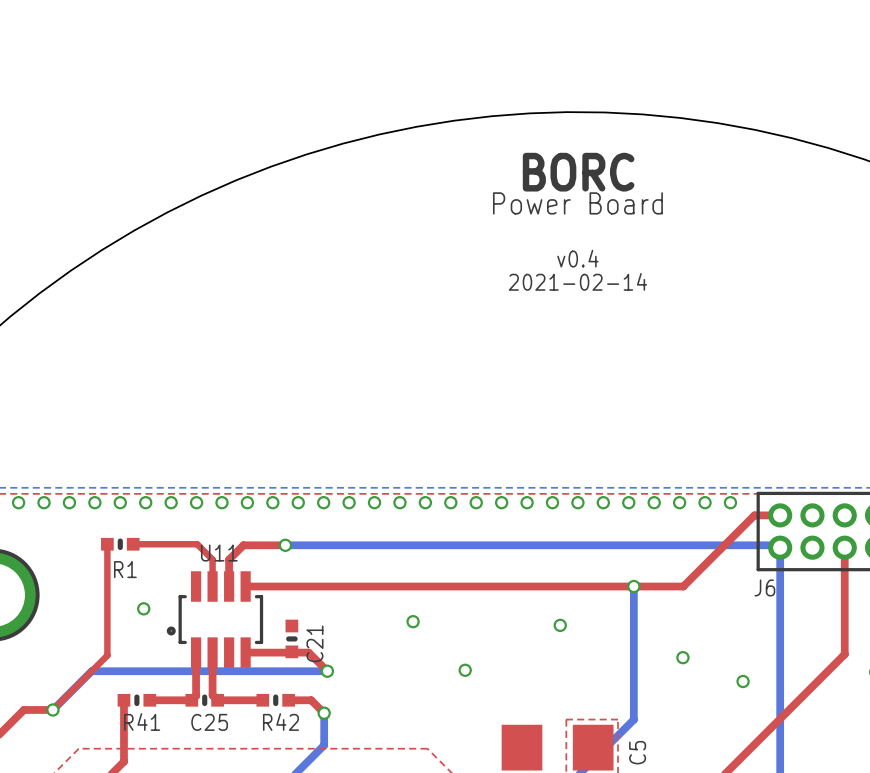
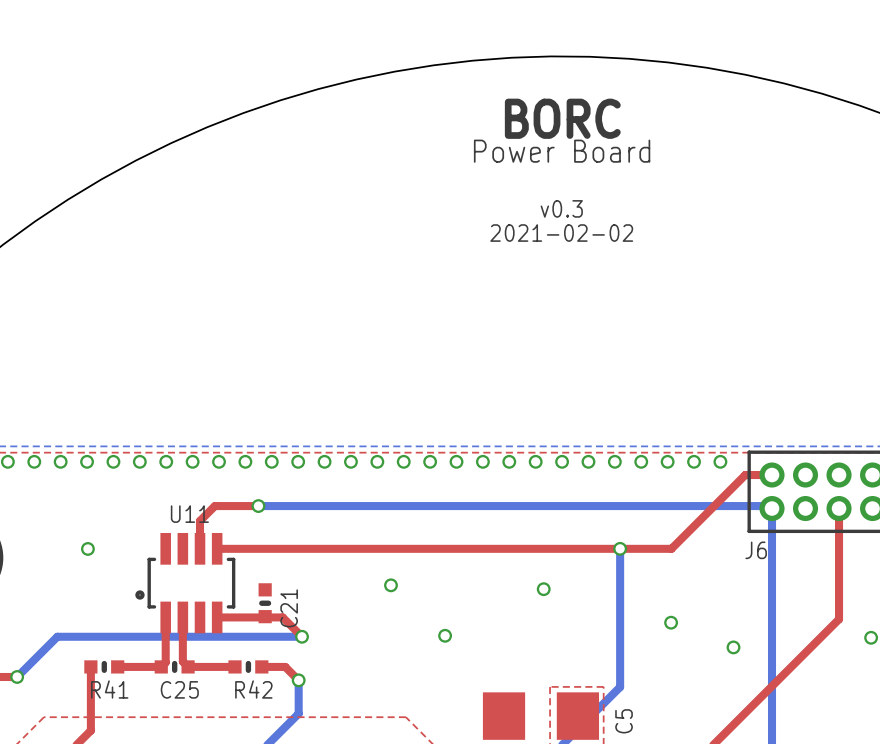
text: v0.4 (577, 258) -> v0.3 (561, 208)
text: 2021-02-14 (577, 281) -> 2021-02-02 (561, 233)
top track: (107, 544) (107, 655) (52, 709) -> none
R1: (120, 544) -> none
top track: (133, 544) (197, 544) (212, 559) (212, 586) -> none
via position: (143, 608) -> (87, 548)

